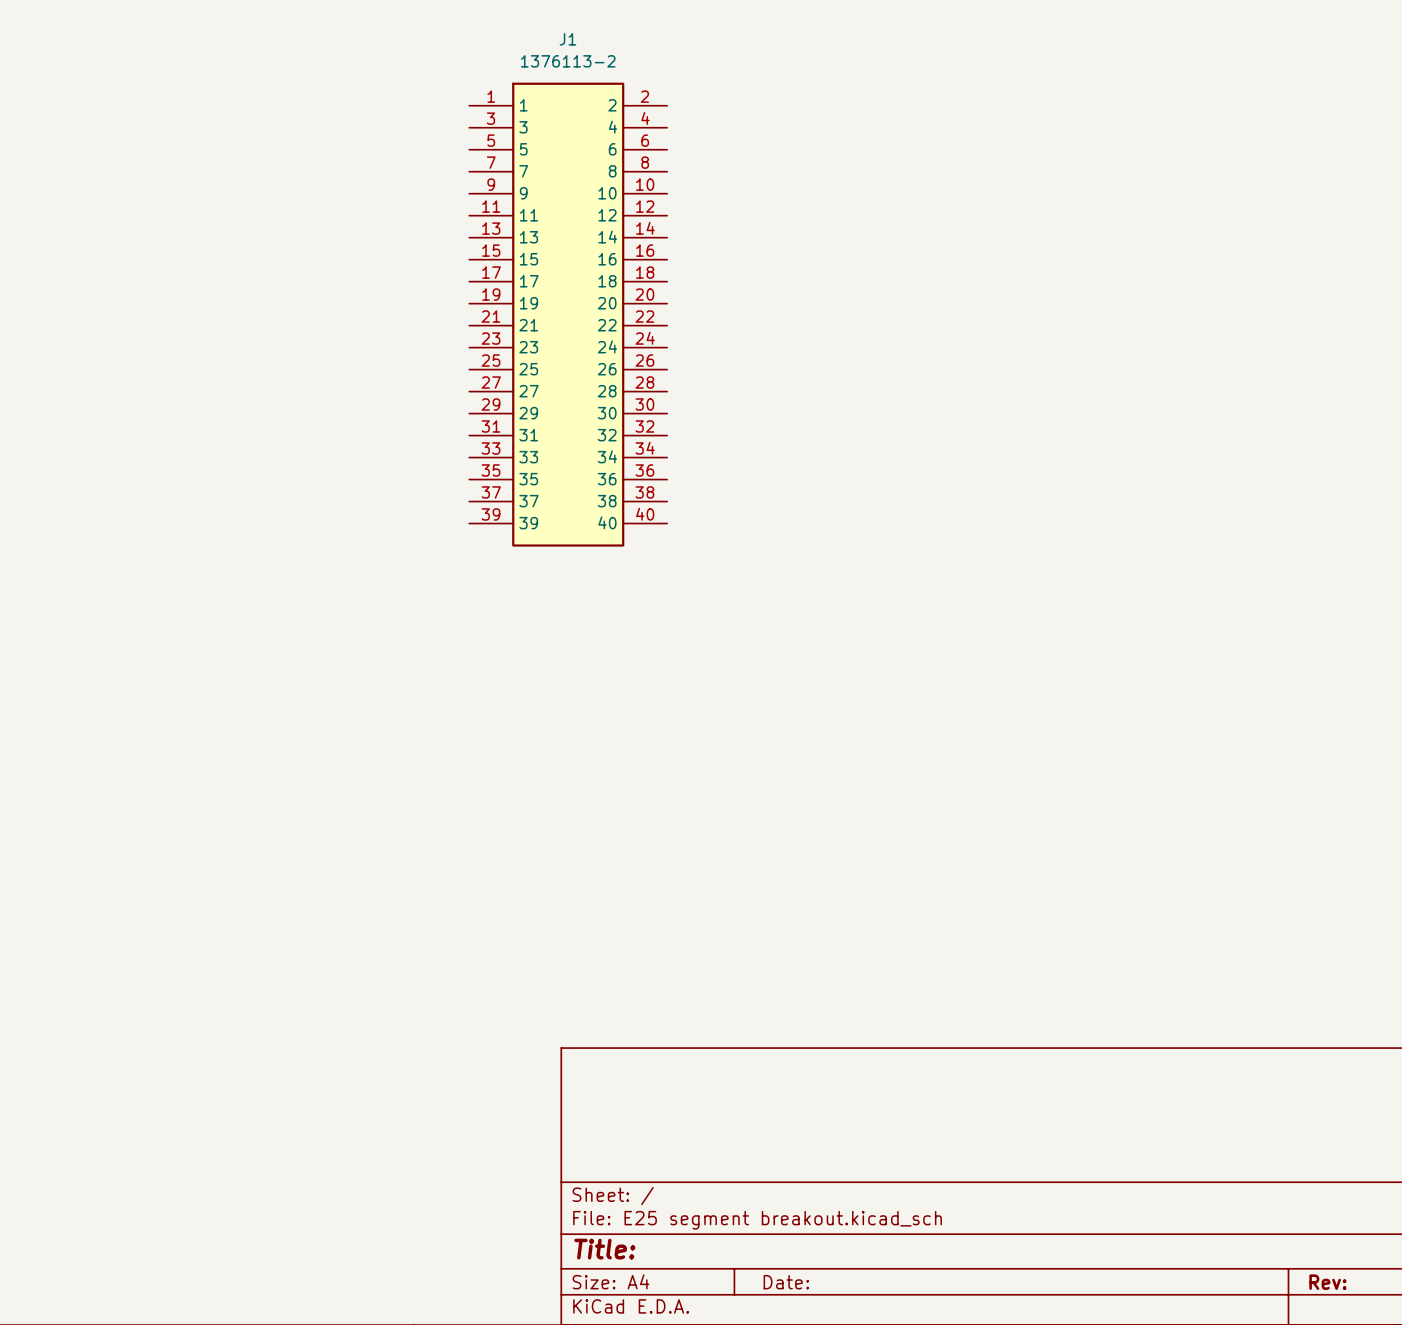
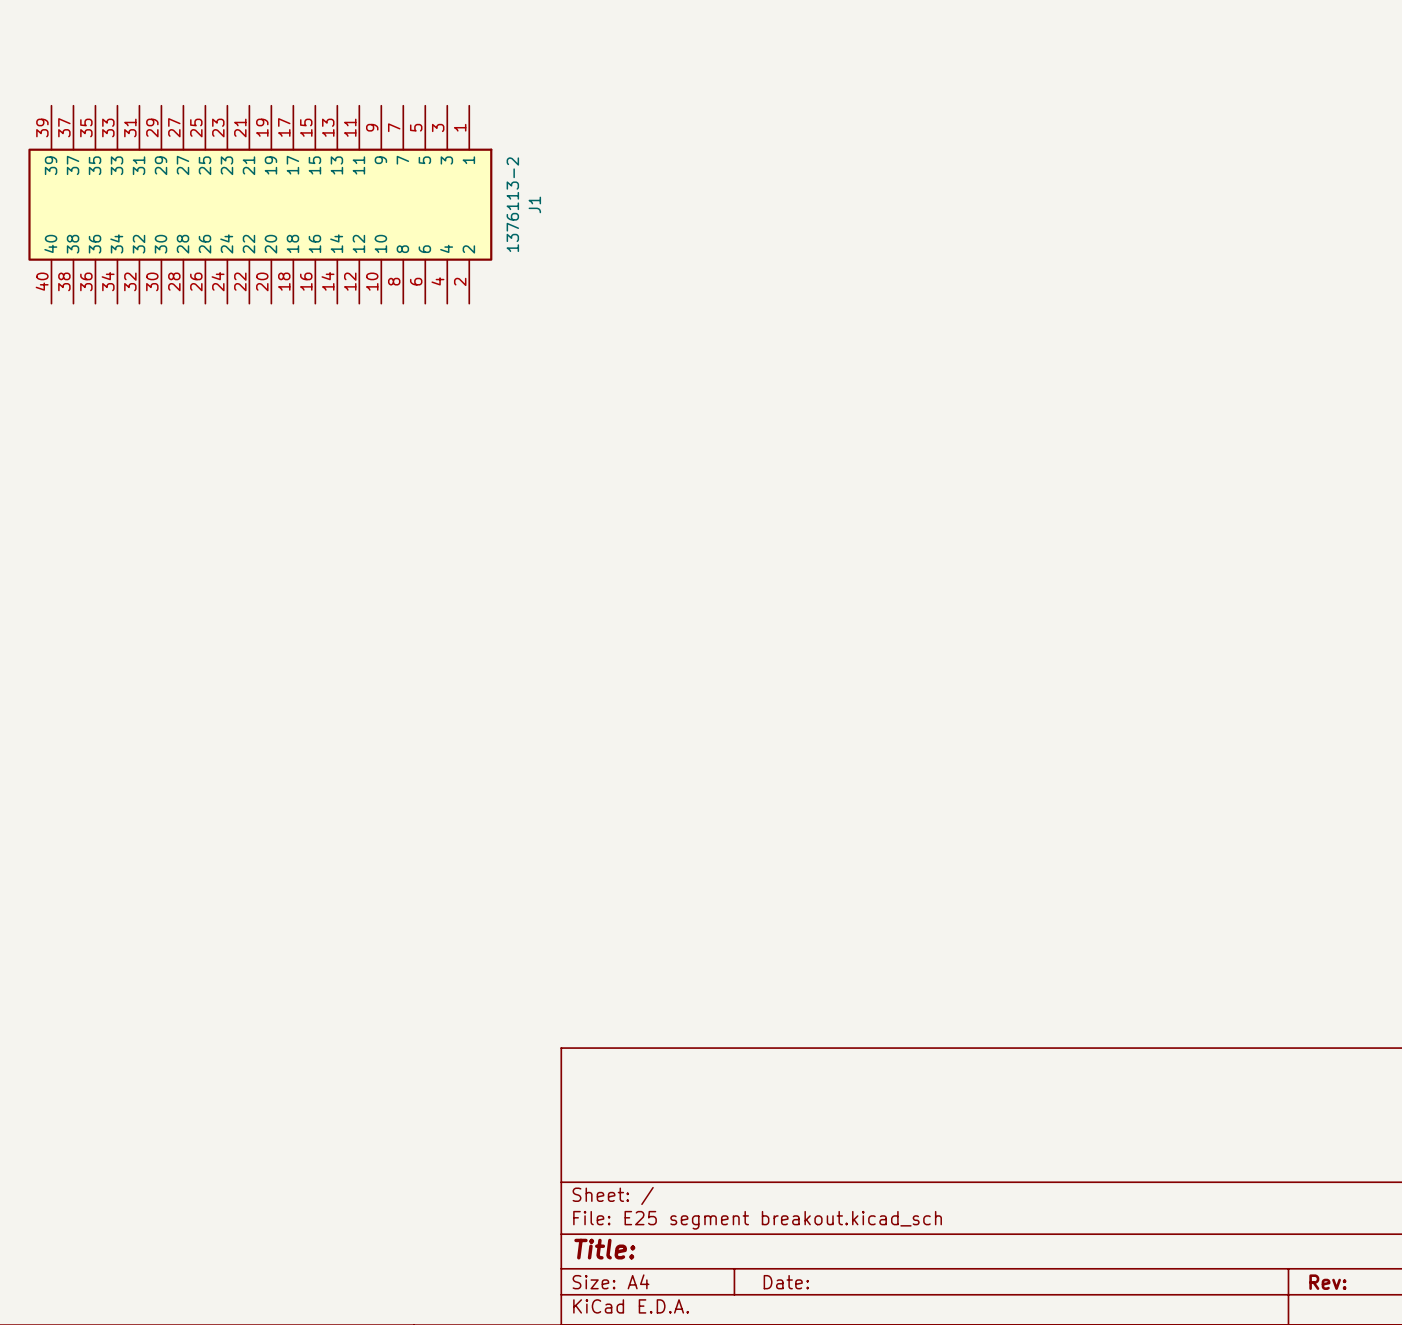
J1 rotation: 0° (568, 314) -> 90° clockwise (260, 204)
J1 position: (568, 314) -> (260, 204)

